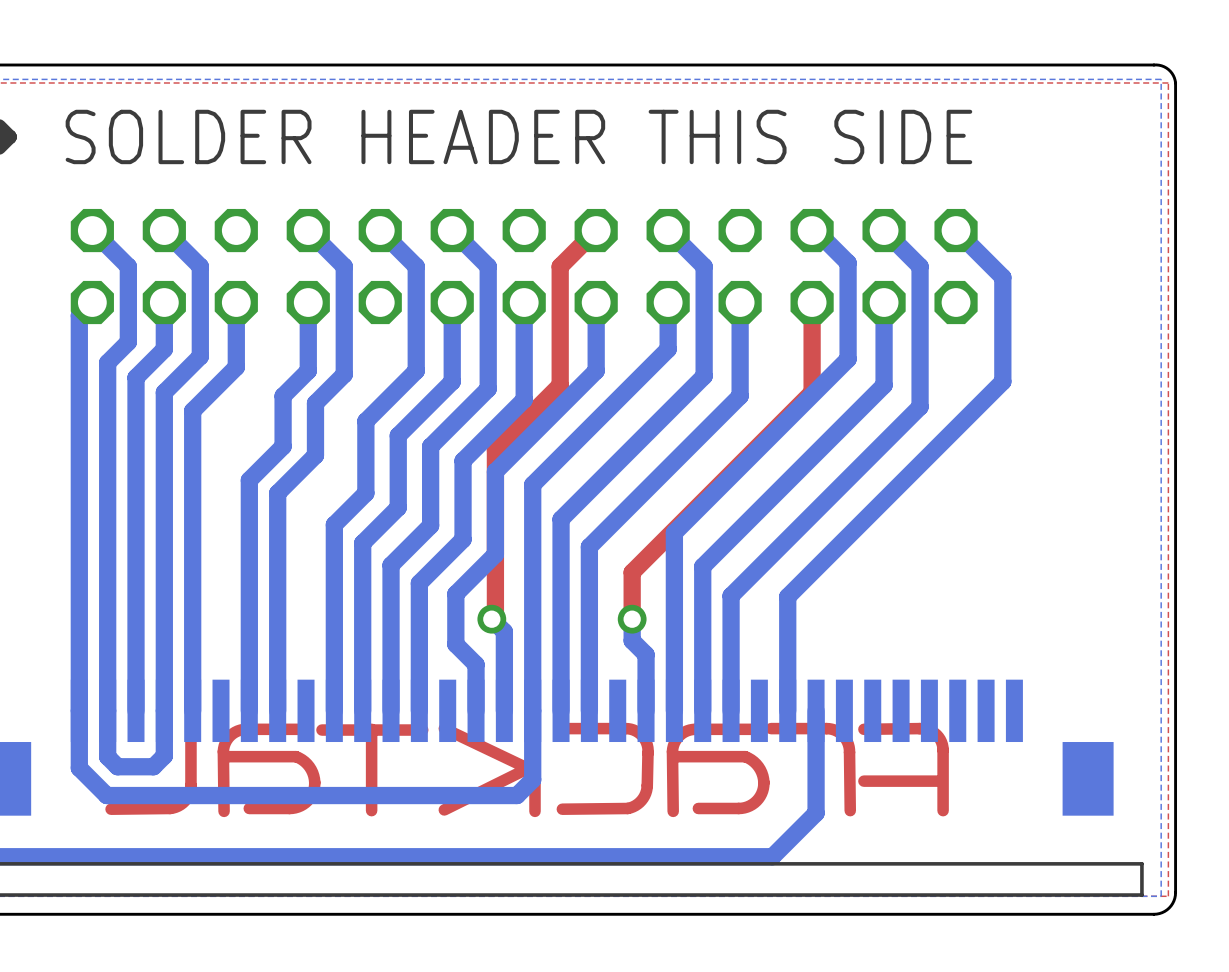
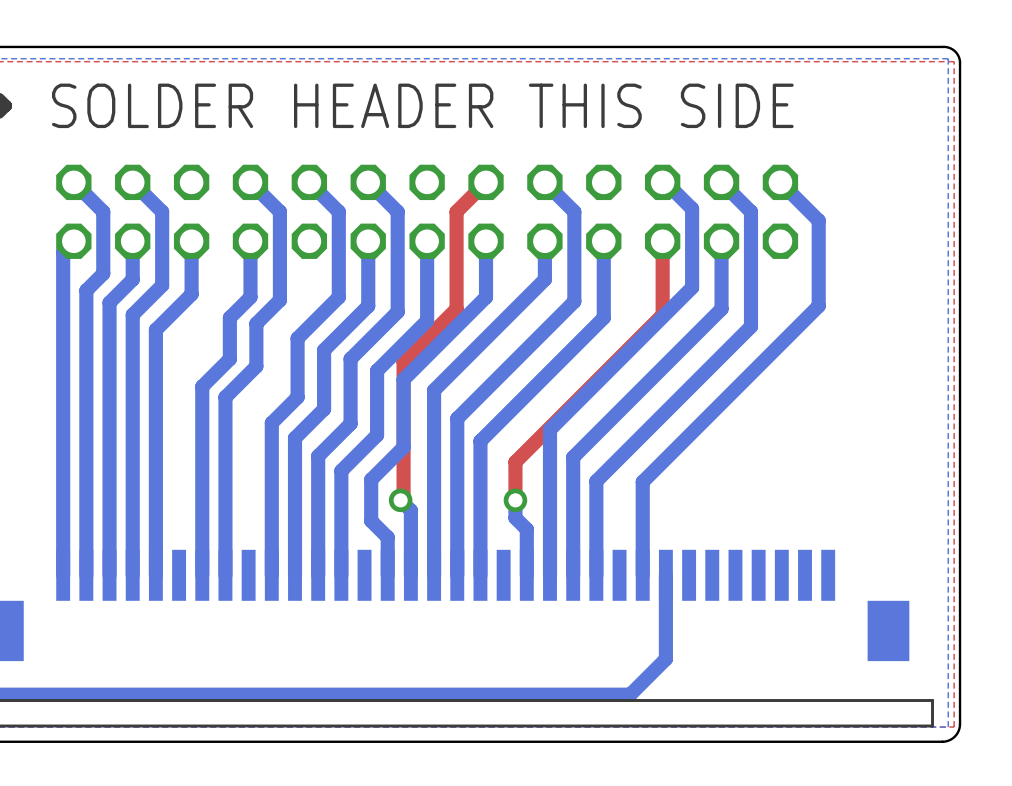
bottom track: (164, 710) (164, 755) (153, 766) (117, 766) (107, 756) (107, 710) -> none
bottom track: (532, 710) (532, 779) (517, 795) (106, 795) (79, 768) (79, 710) -> none
drawing: [105, 719, 949, 818] -> none

